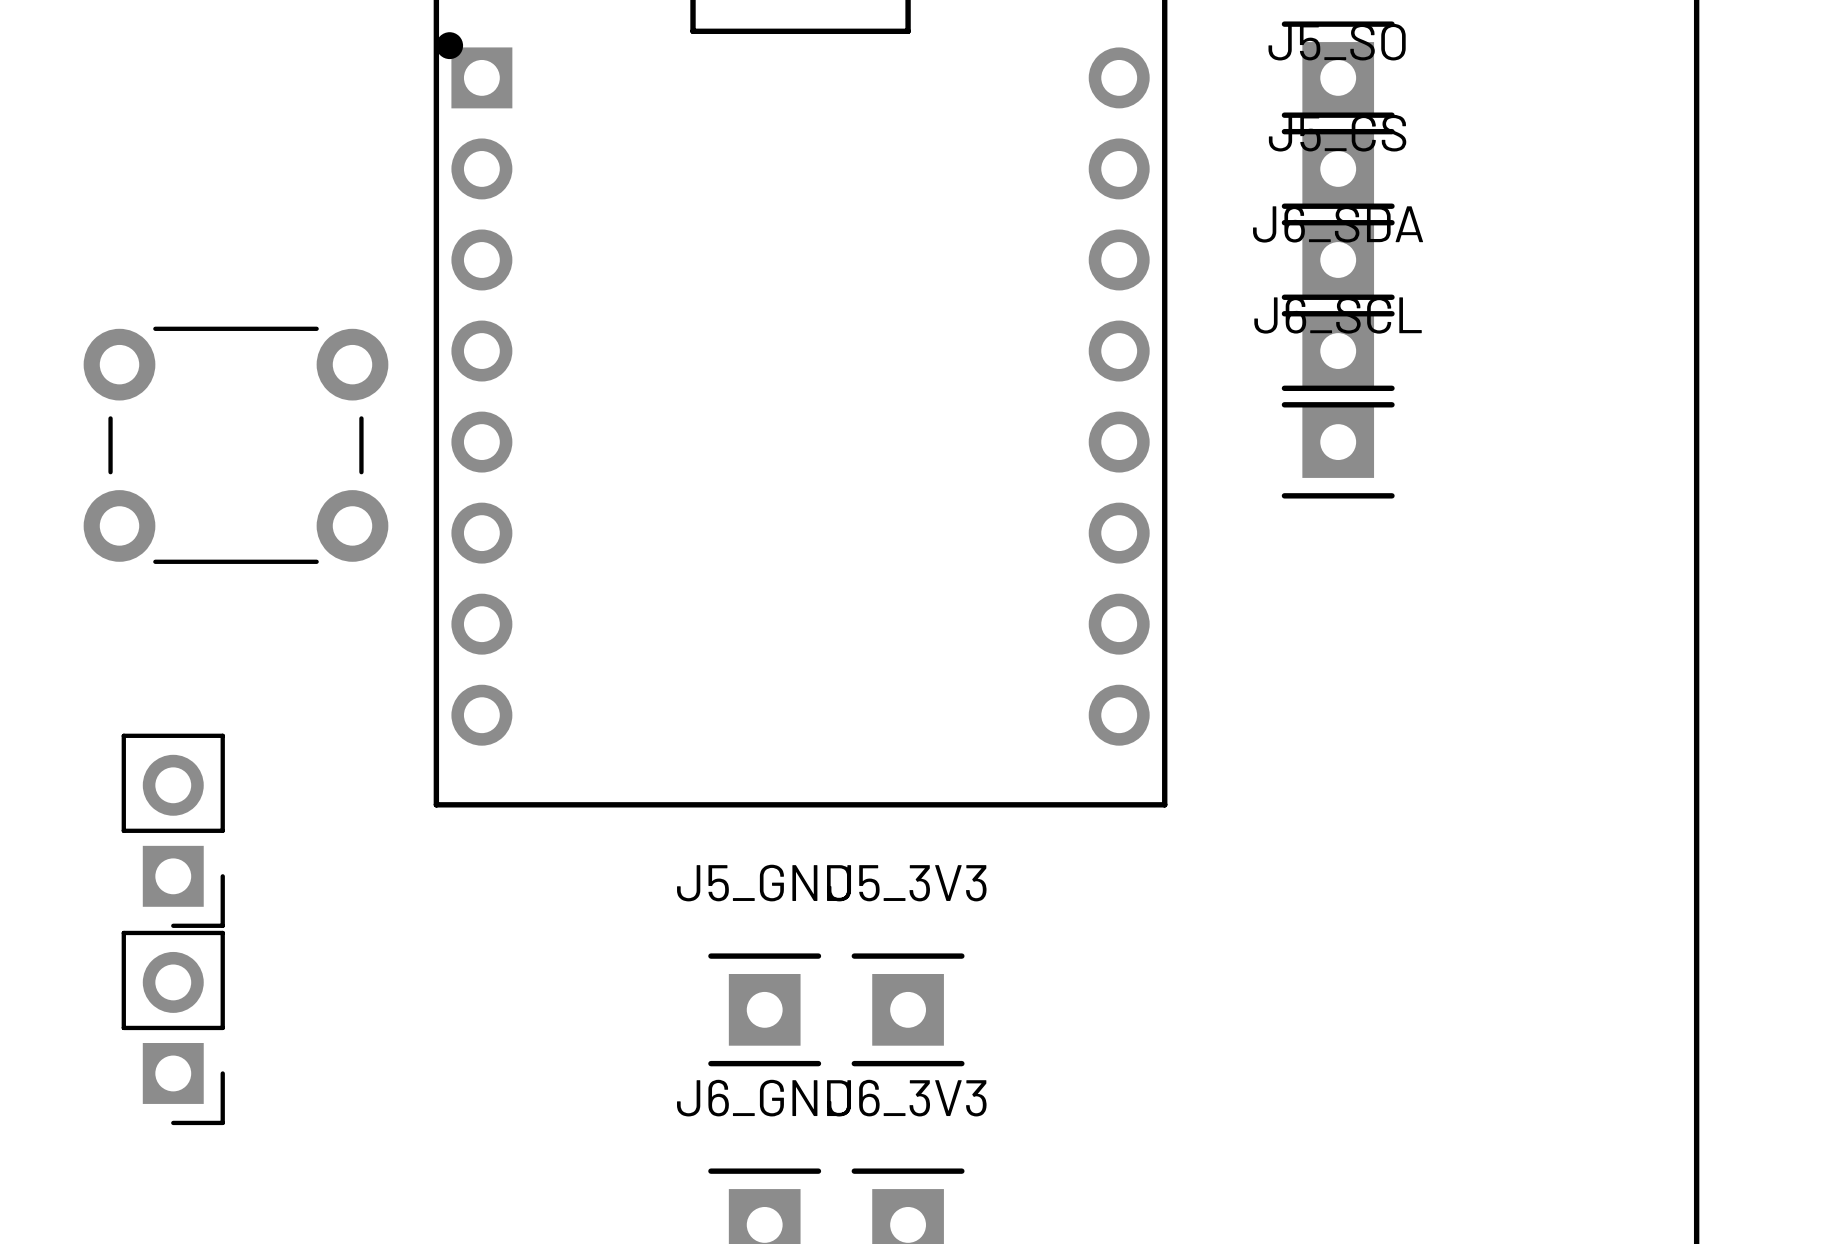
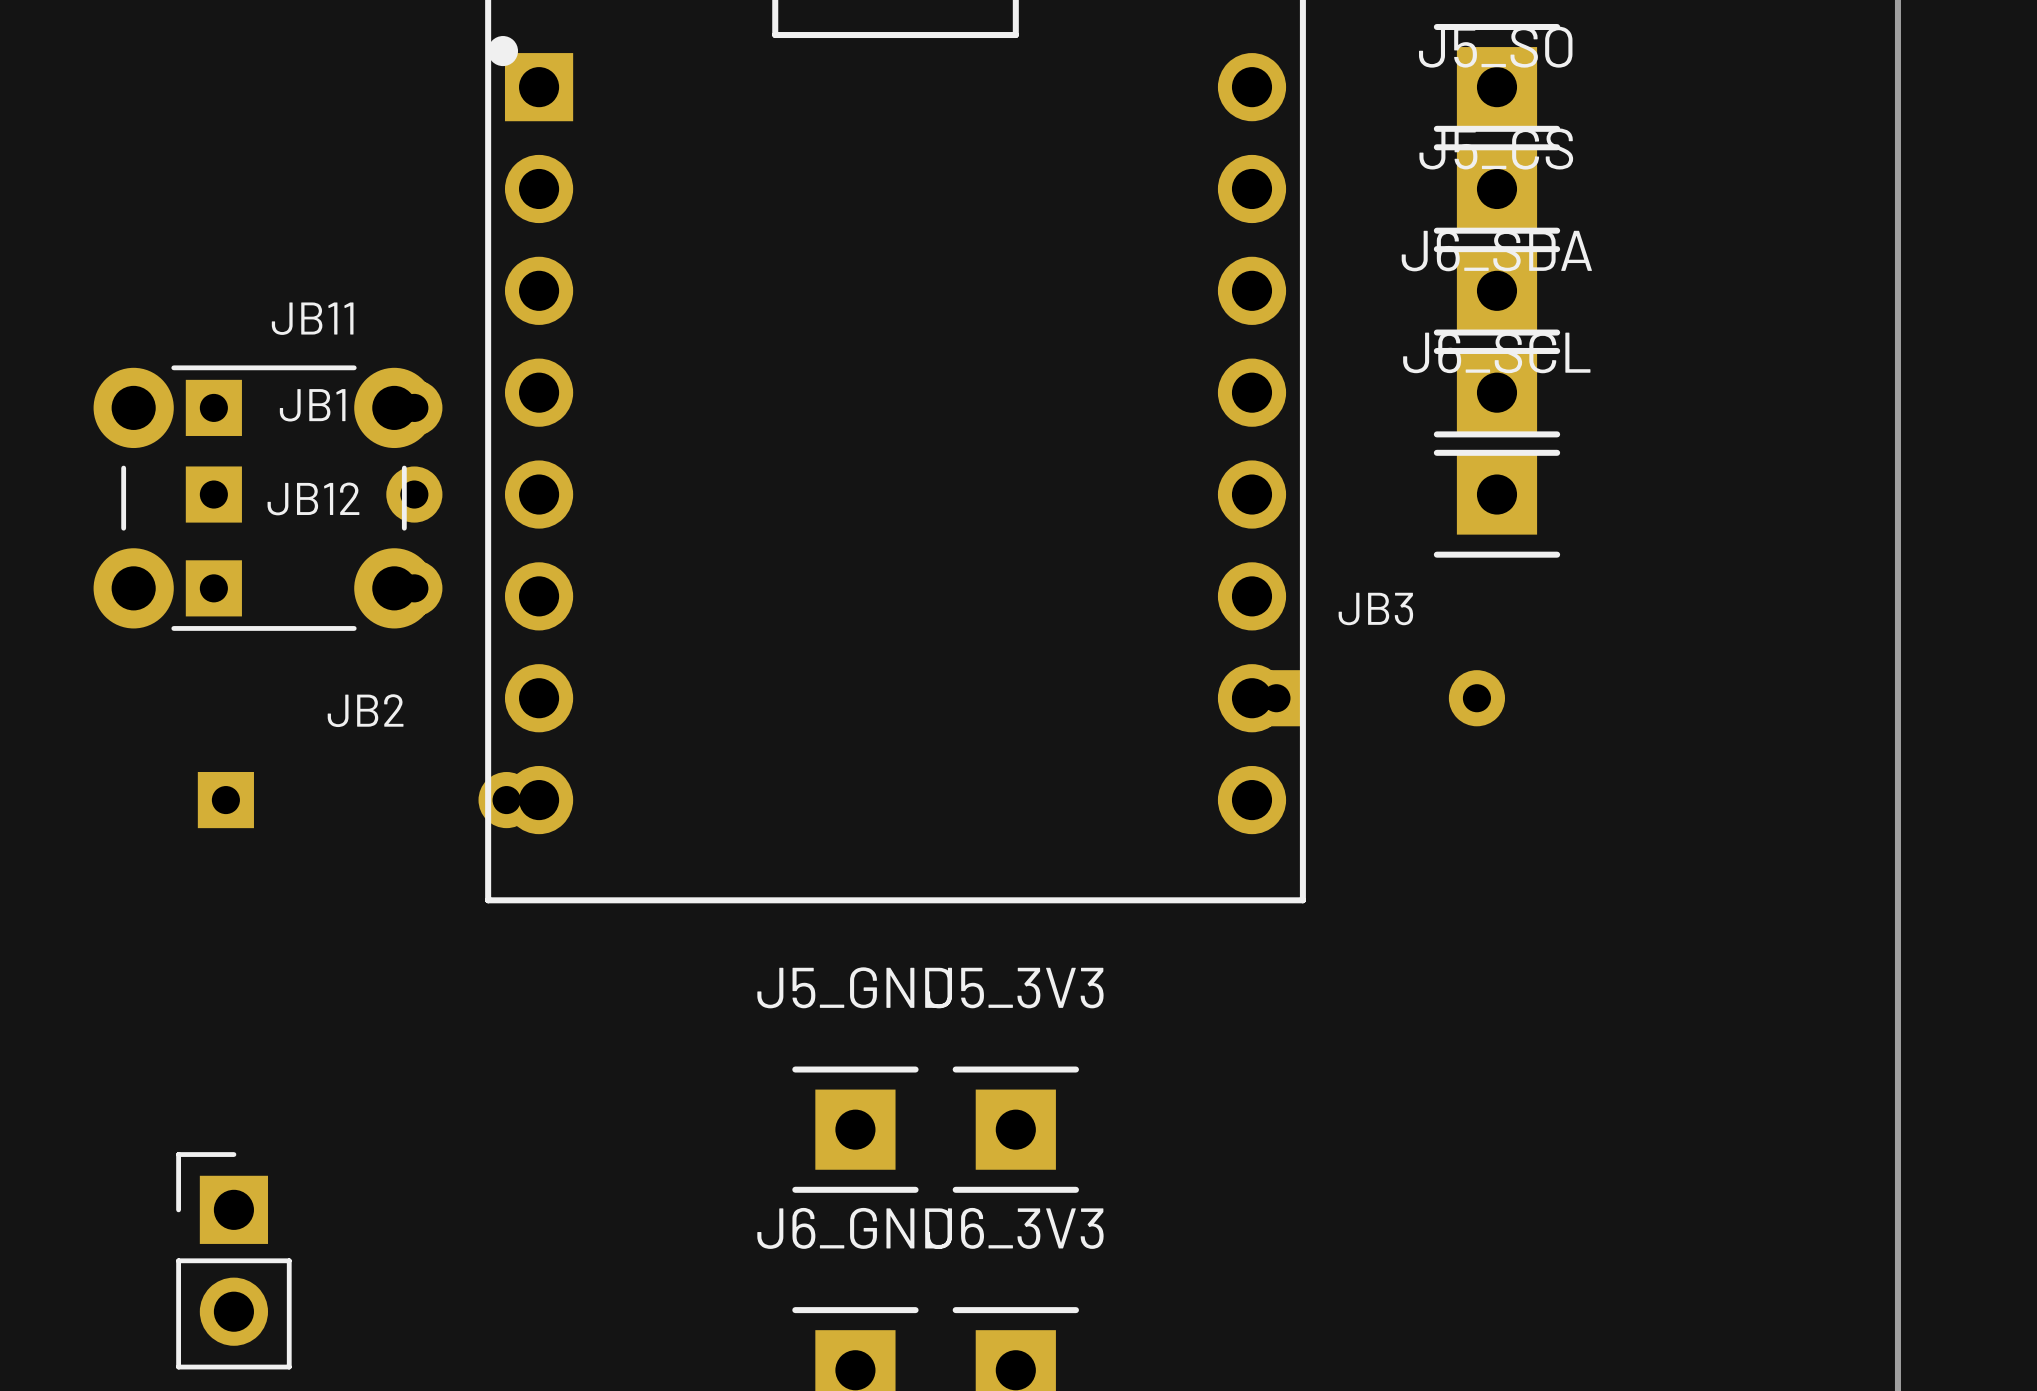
JB11: none -> (314, 407)
JB1: none -> (314, 494)
JB12: none -> (314, 588)
JB3: none -> (1376, 698)
JB2: none -> (366, 800)
part: (173, 830) -> none
part rotation: 0° (173, 1027) -> 180° (233, 1260)

